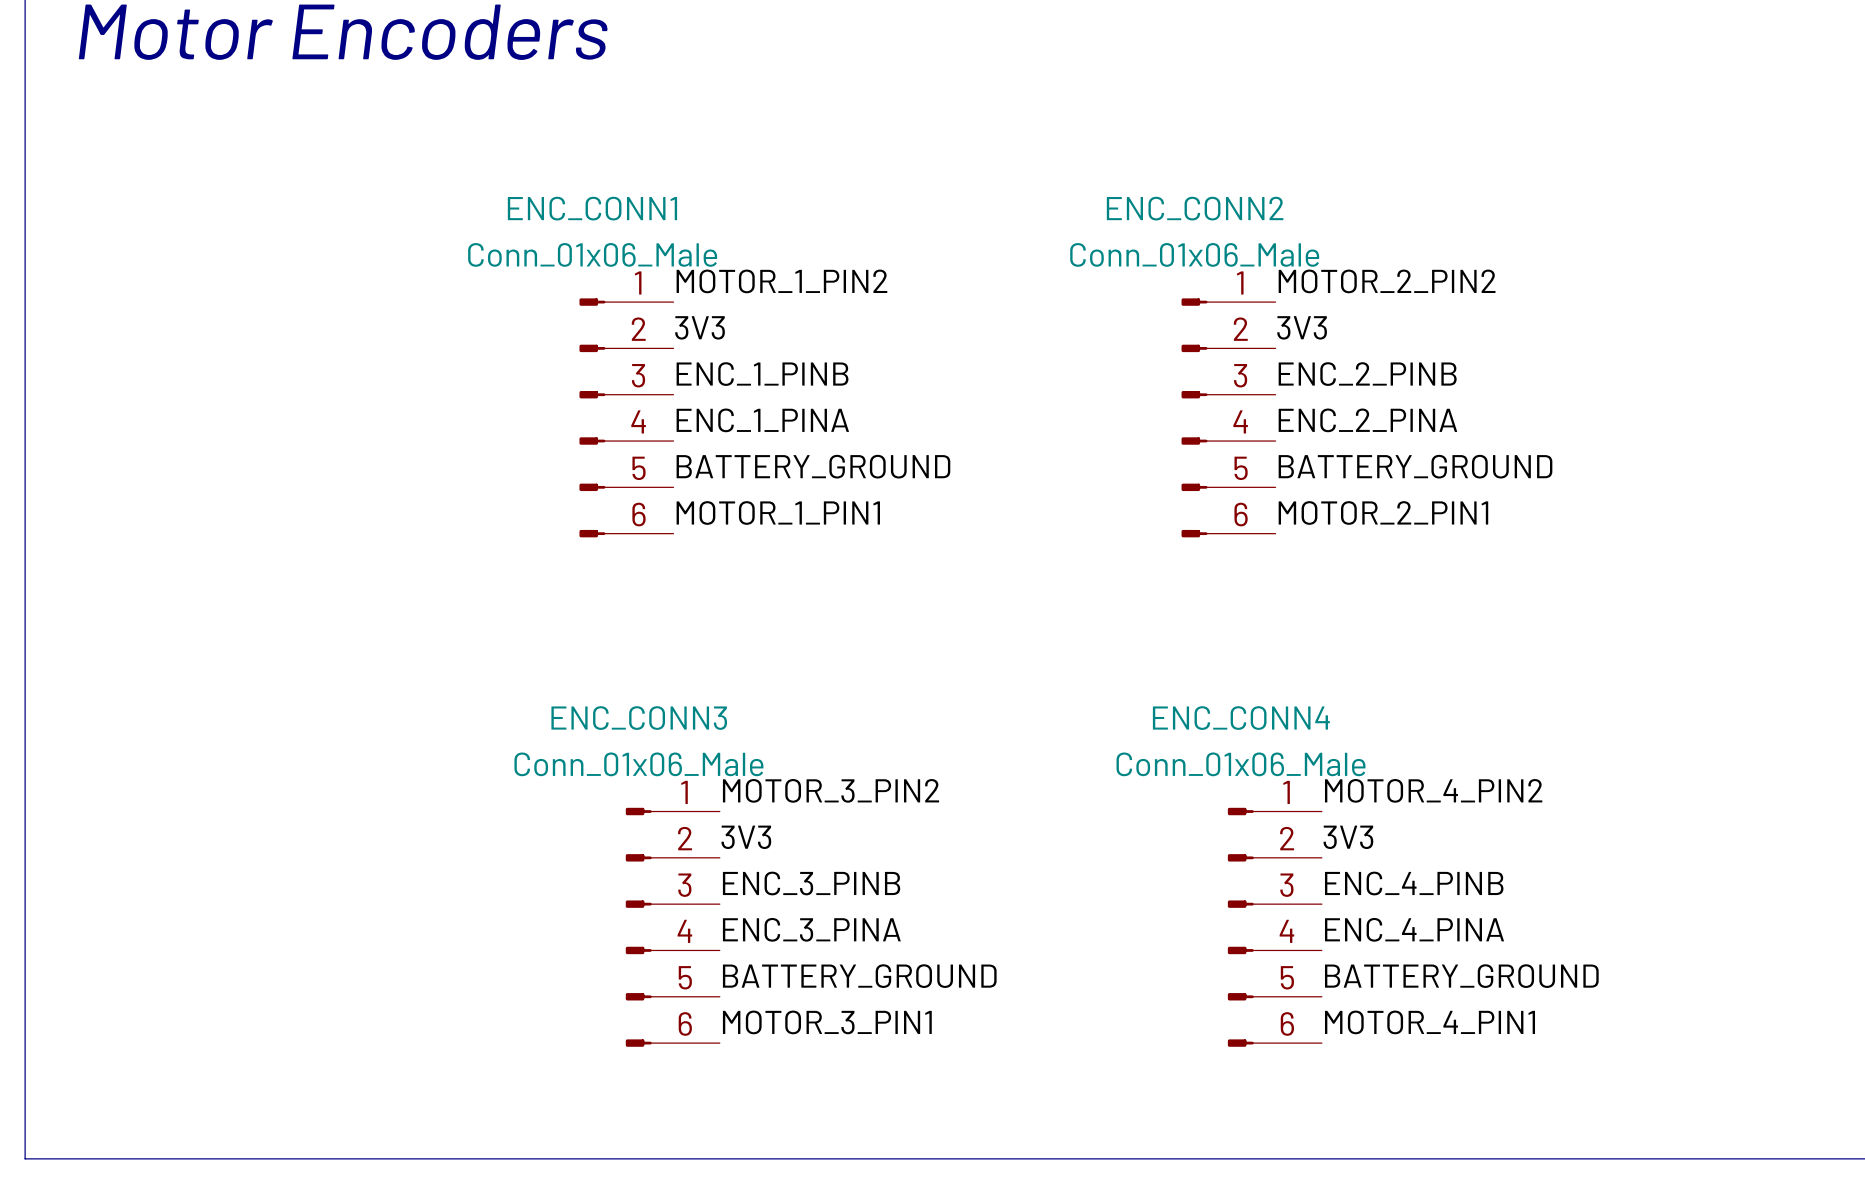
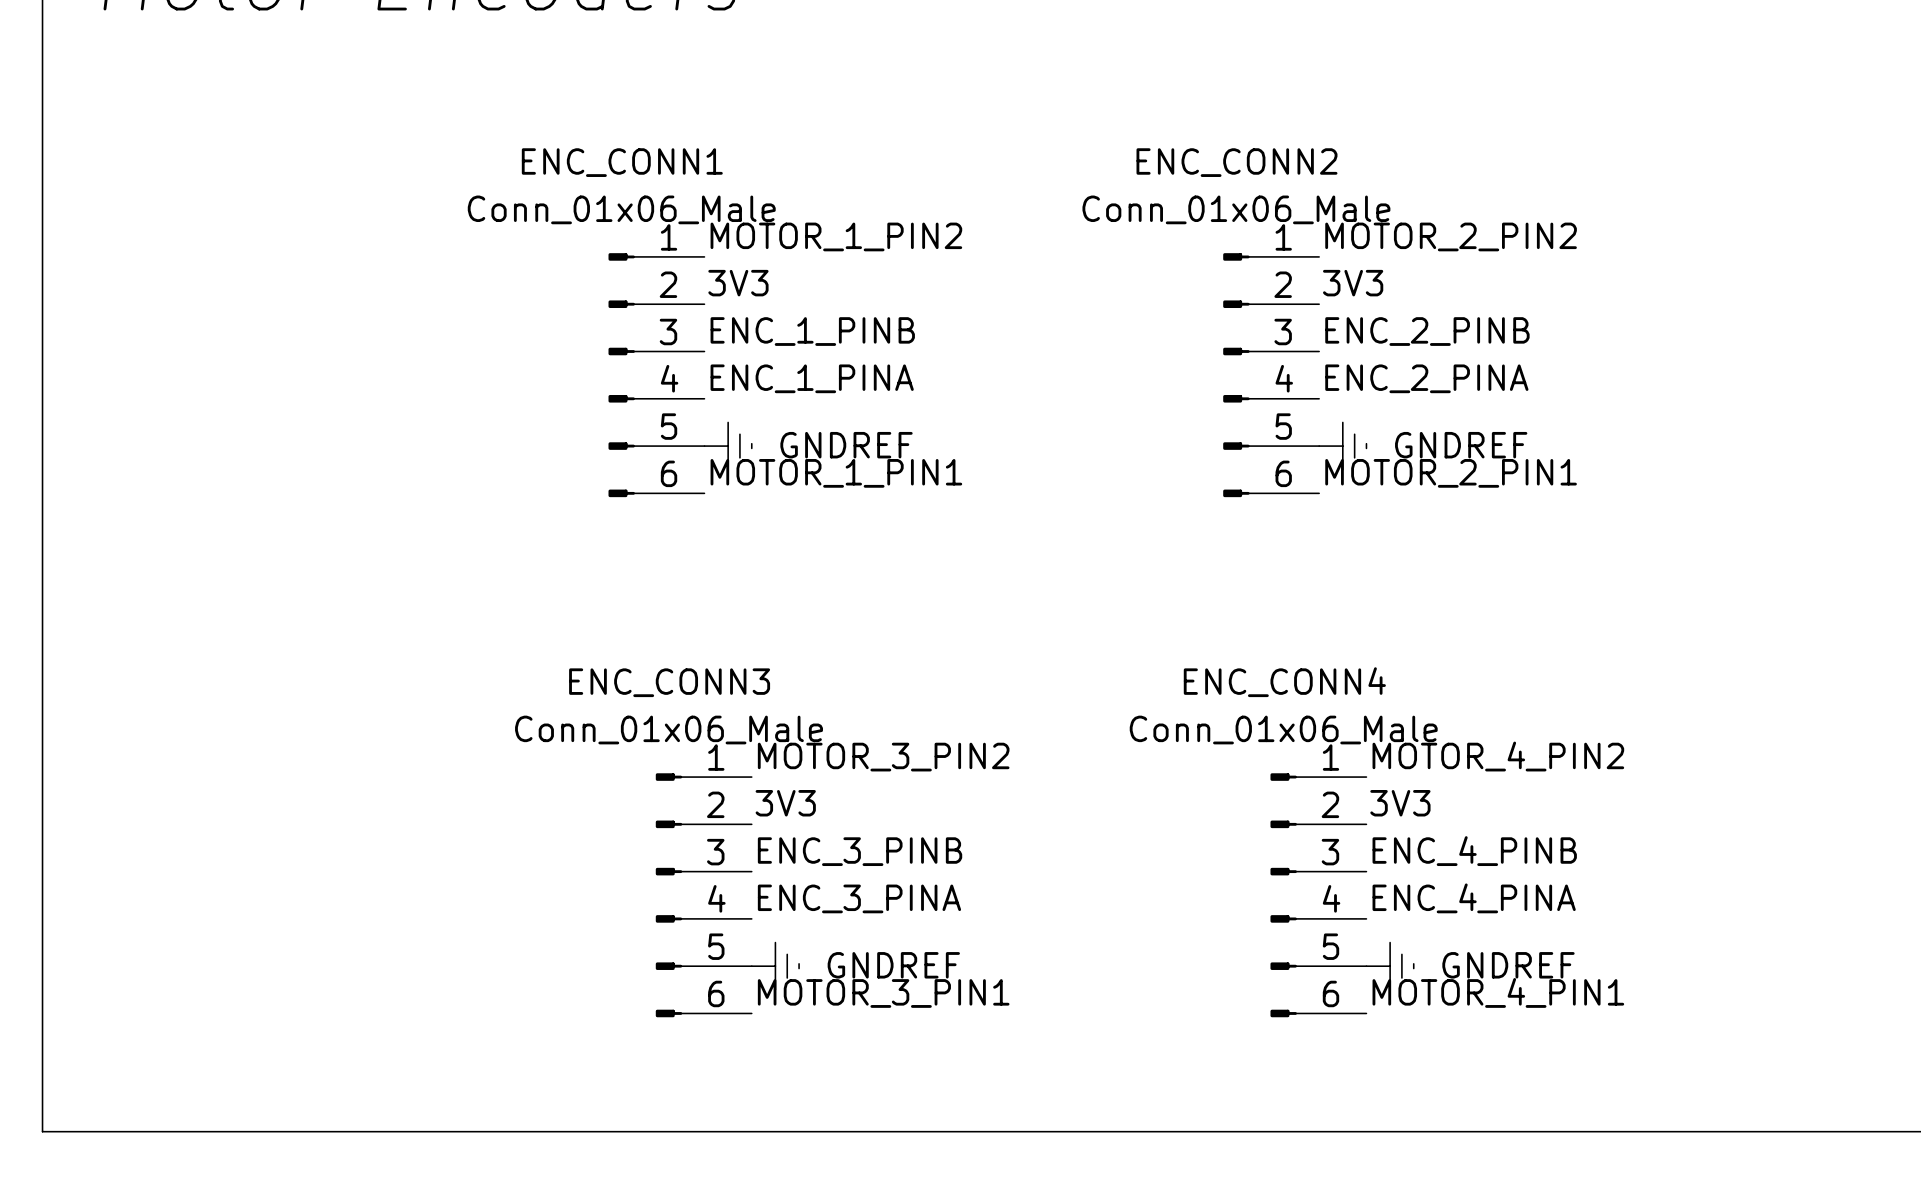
label: BATTERY_GROUND (813, 466) -> none
label: BATTERY_GROUND (1415, 466) -> none
power symbol: none -> GNDREF (728, 446)
power symbol: none -> GNDREF (1342, 446)
label: BATTERY_GROUND (859, 976) -> none
label: BATTERY_GROUND (1461, 976) -> none
power symbol: none -> GNDREF (775, 966)
power symbol: none -> GNDREF (1390, 966)

